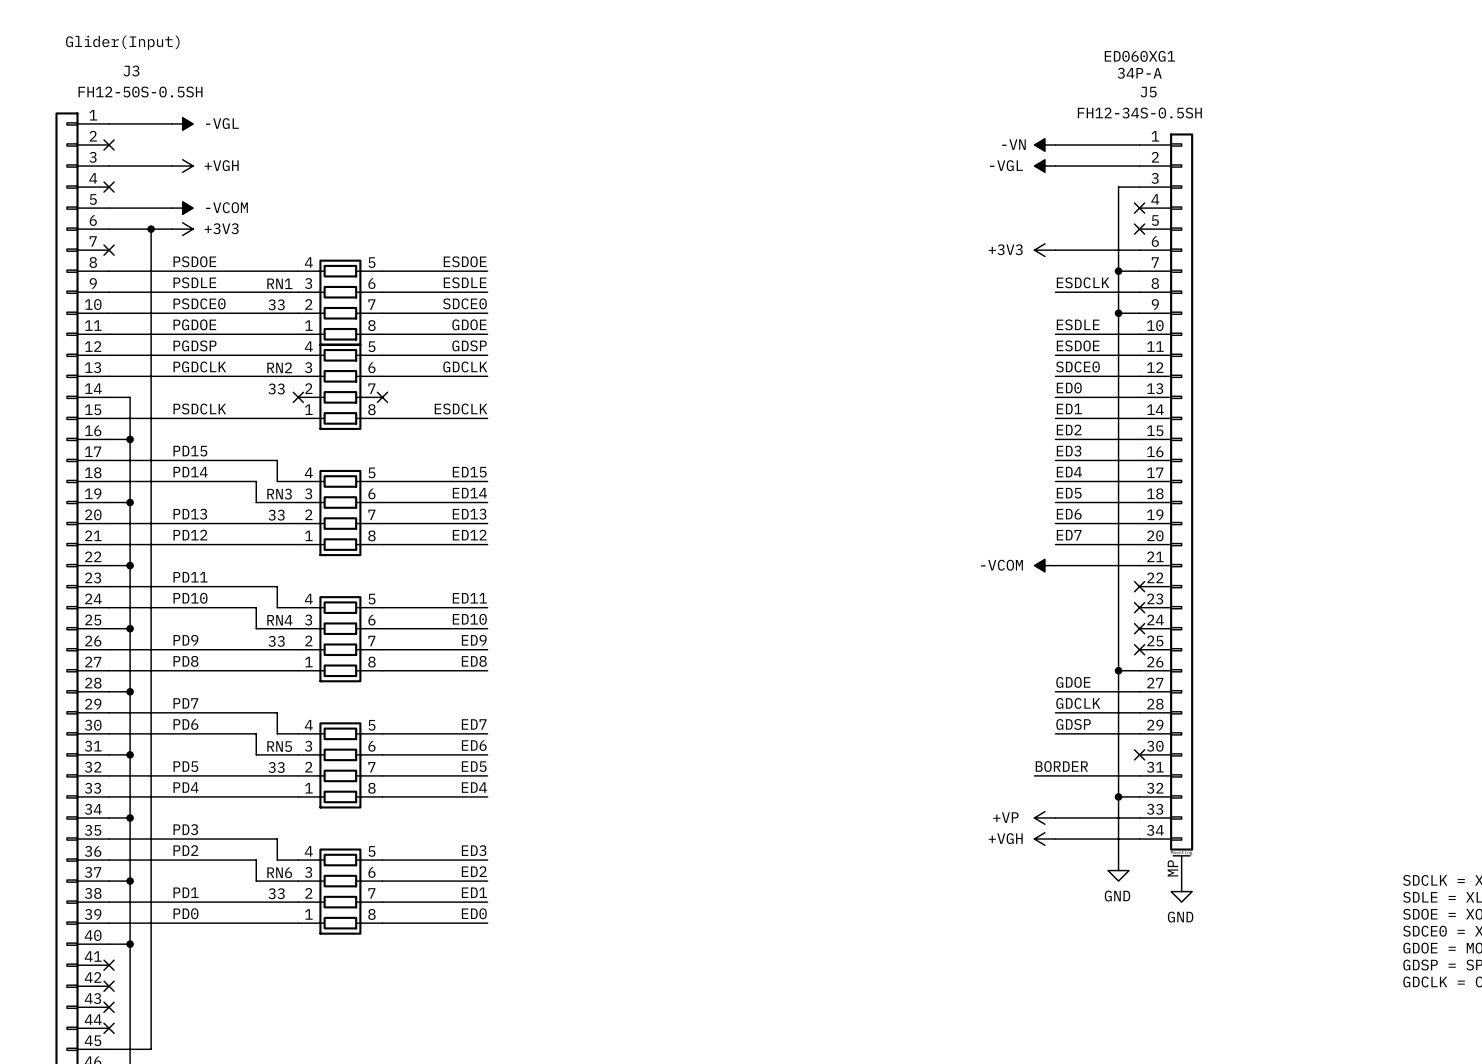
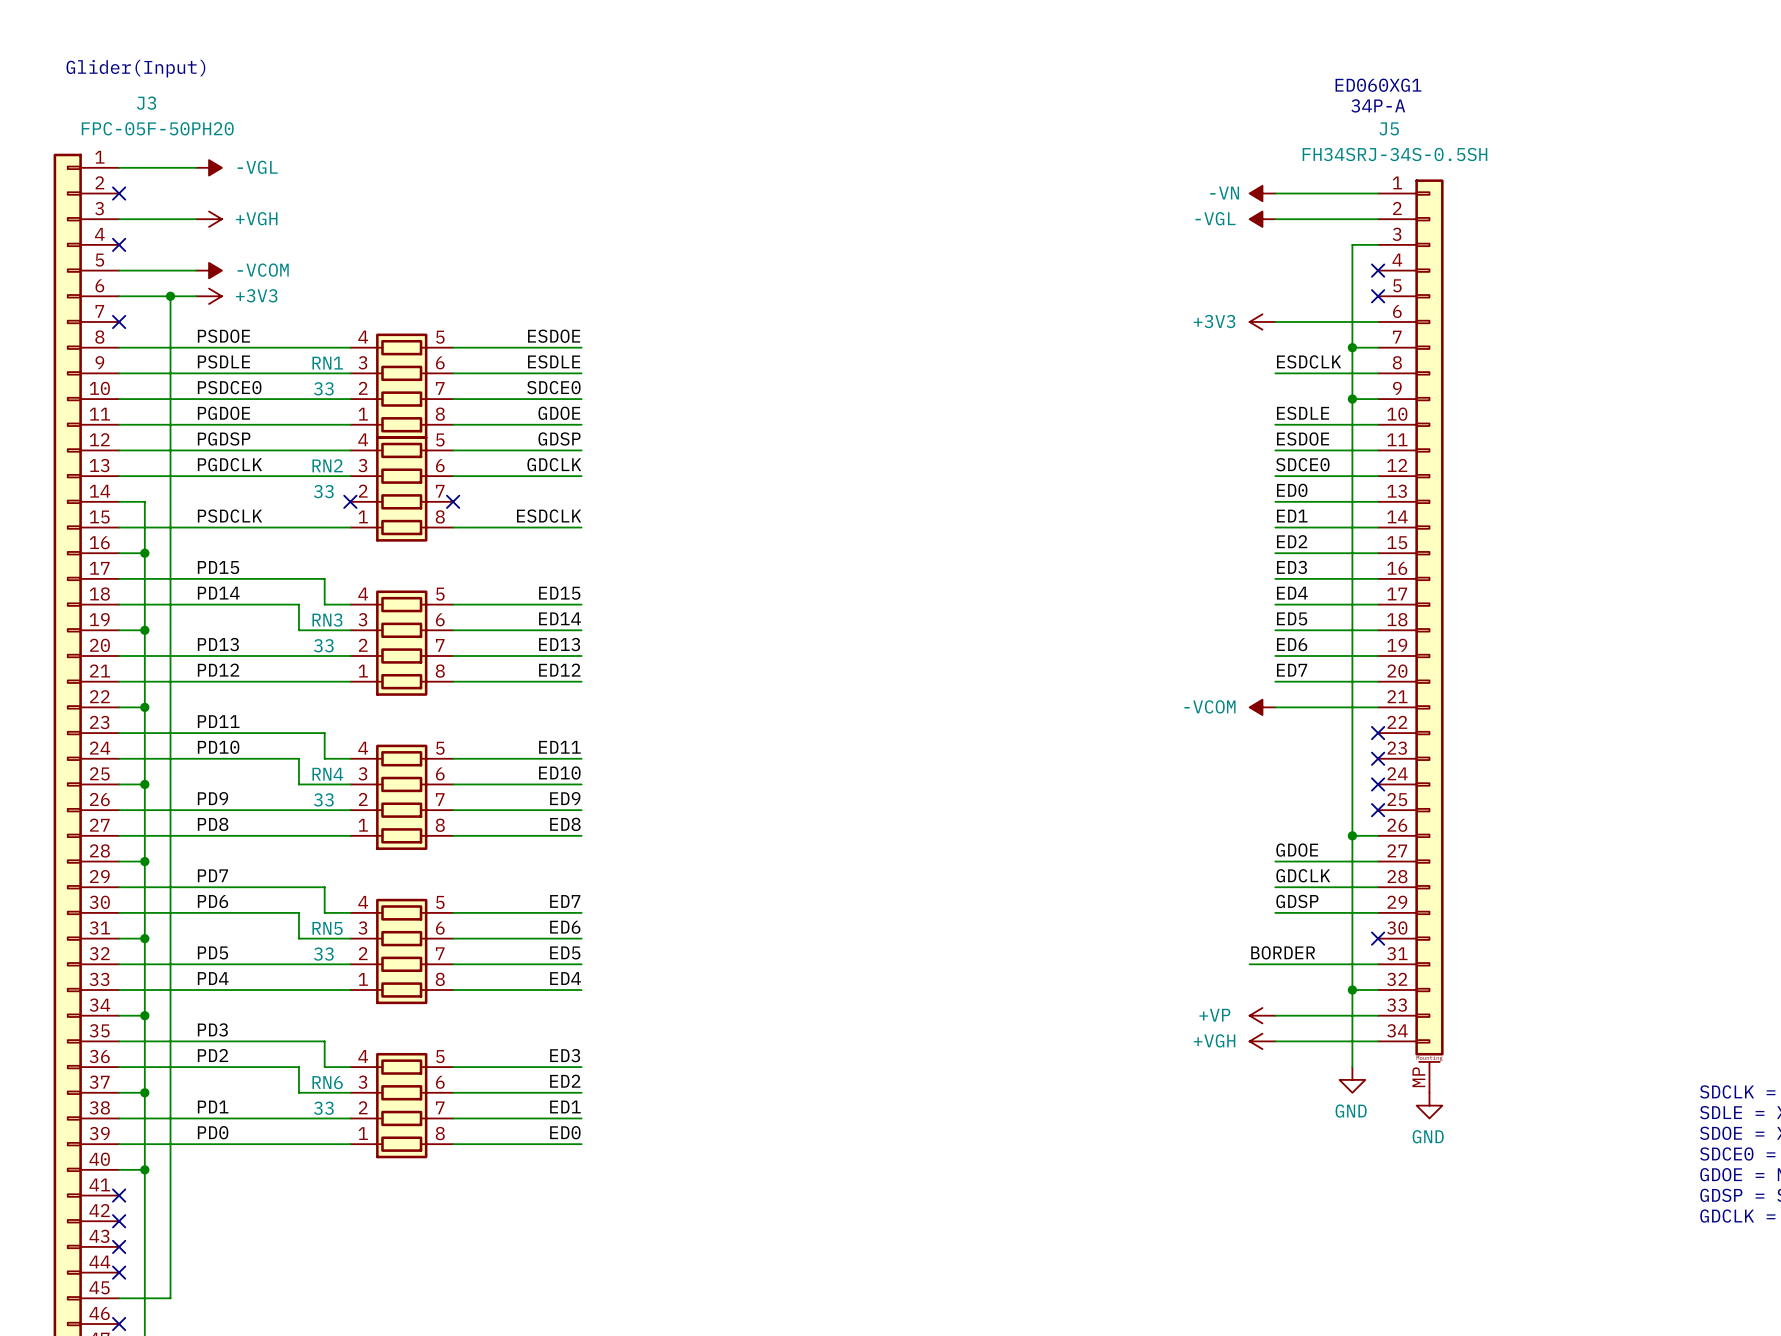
J3 value: FH12-50S-0.5SH (140, 92) -> FPC-05F-50PH20 (157, 128)
J5 value: FH12-34S-0.5SH (1139, 113) -> FH34SRJ-34S-0.5SH (1394, 154)

